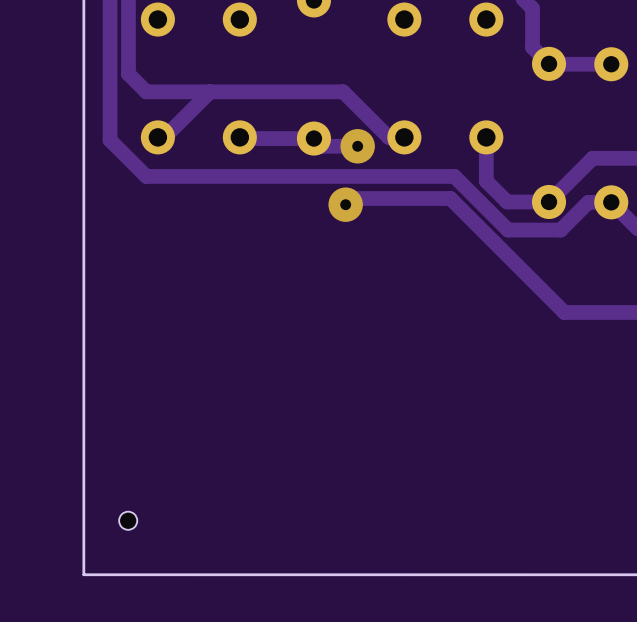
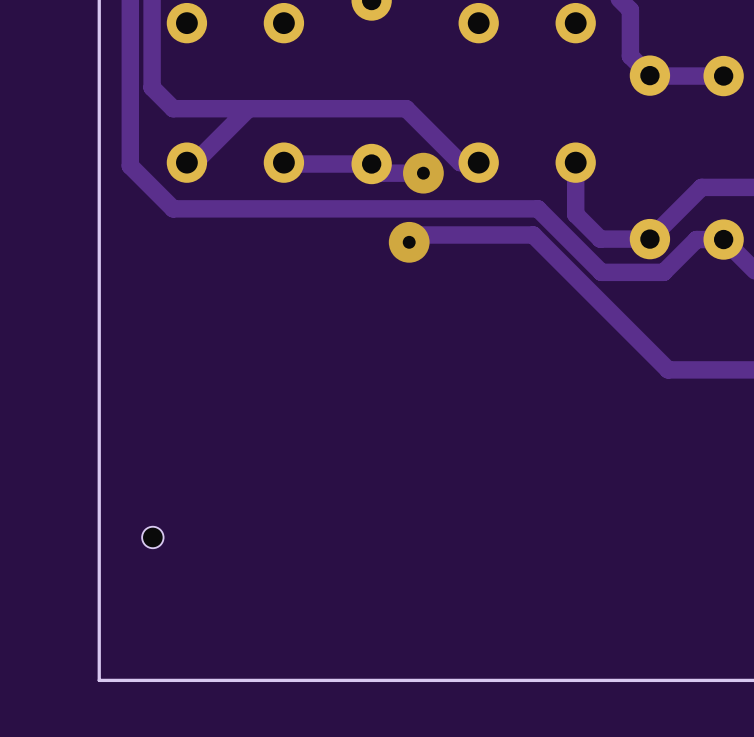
hole position: (128, 520) -> (152, 537)

